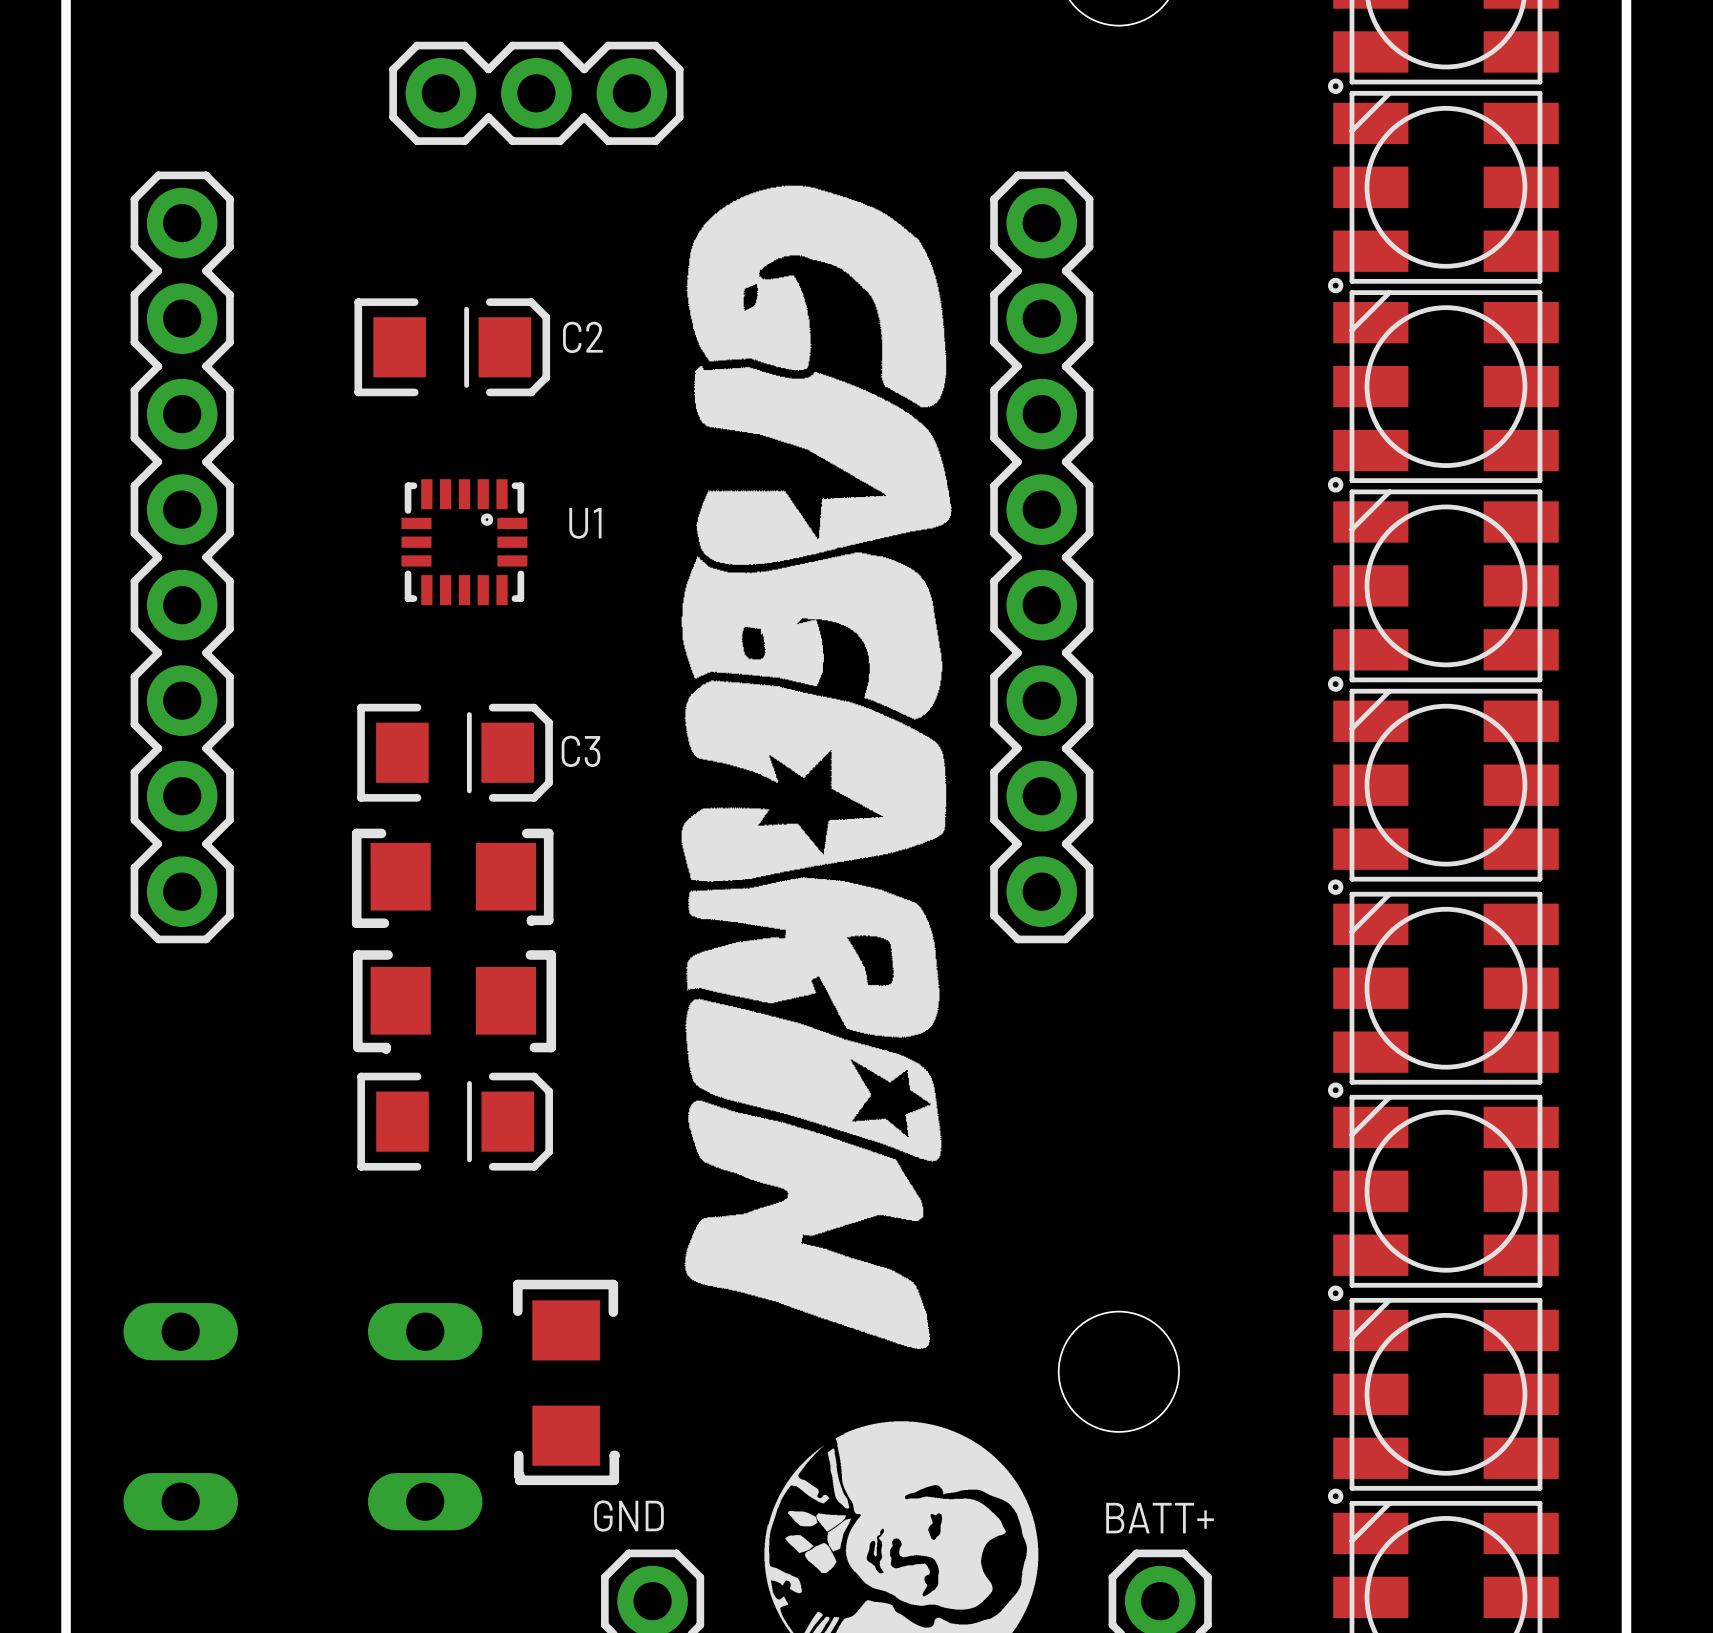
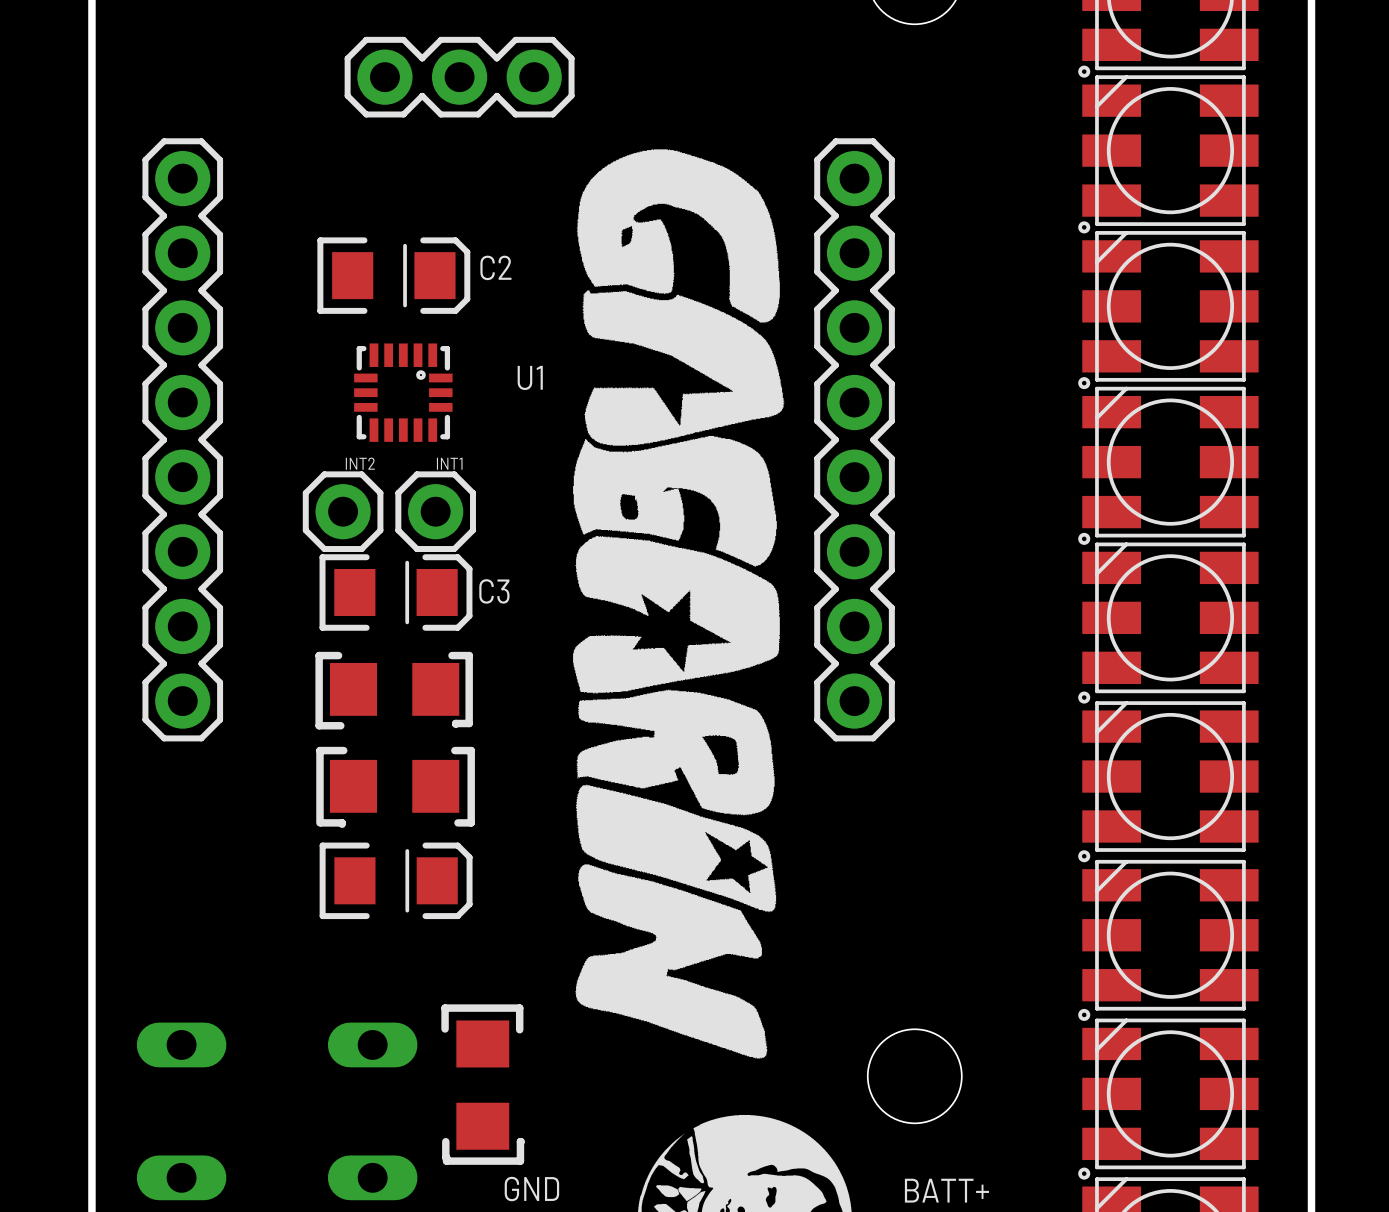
U1 name position: U1 (585, 523) -> U1 (530, 377)
U1 position: (464, 542) -> (403, 392)
INT2: none -> (343, 511)
INT1: none -> (435, 511)

